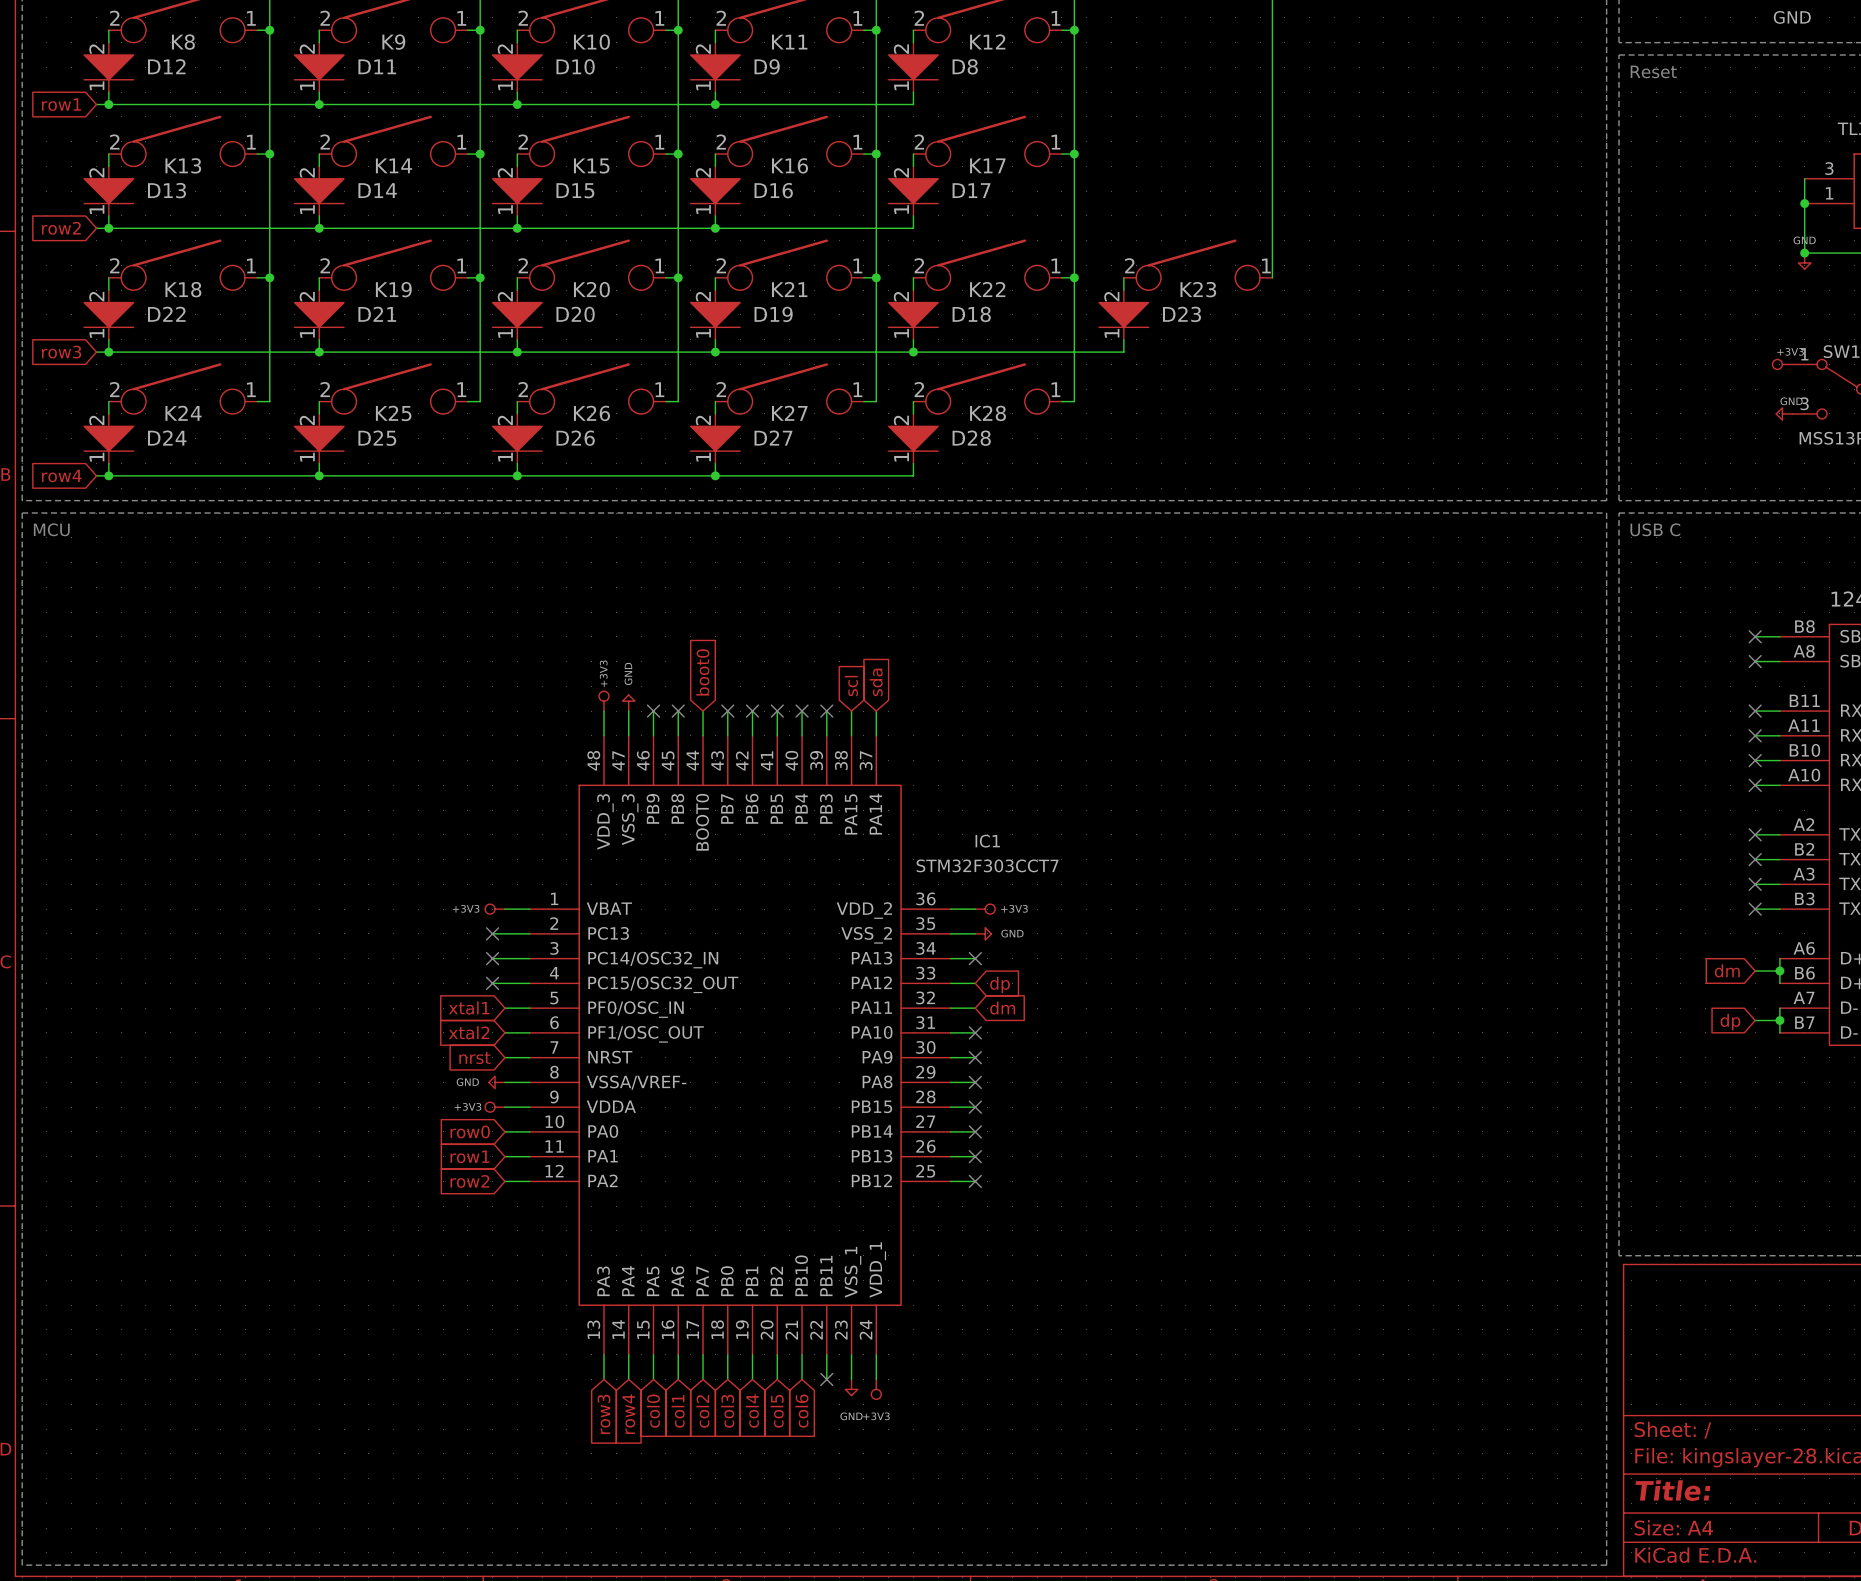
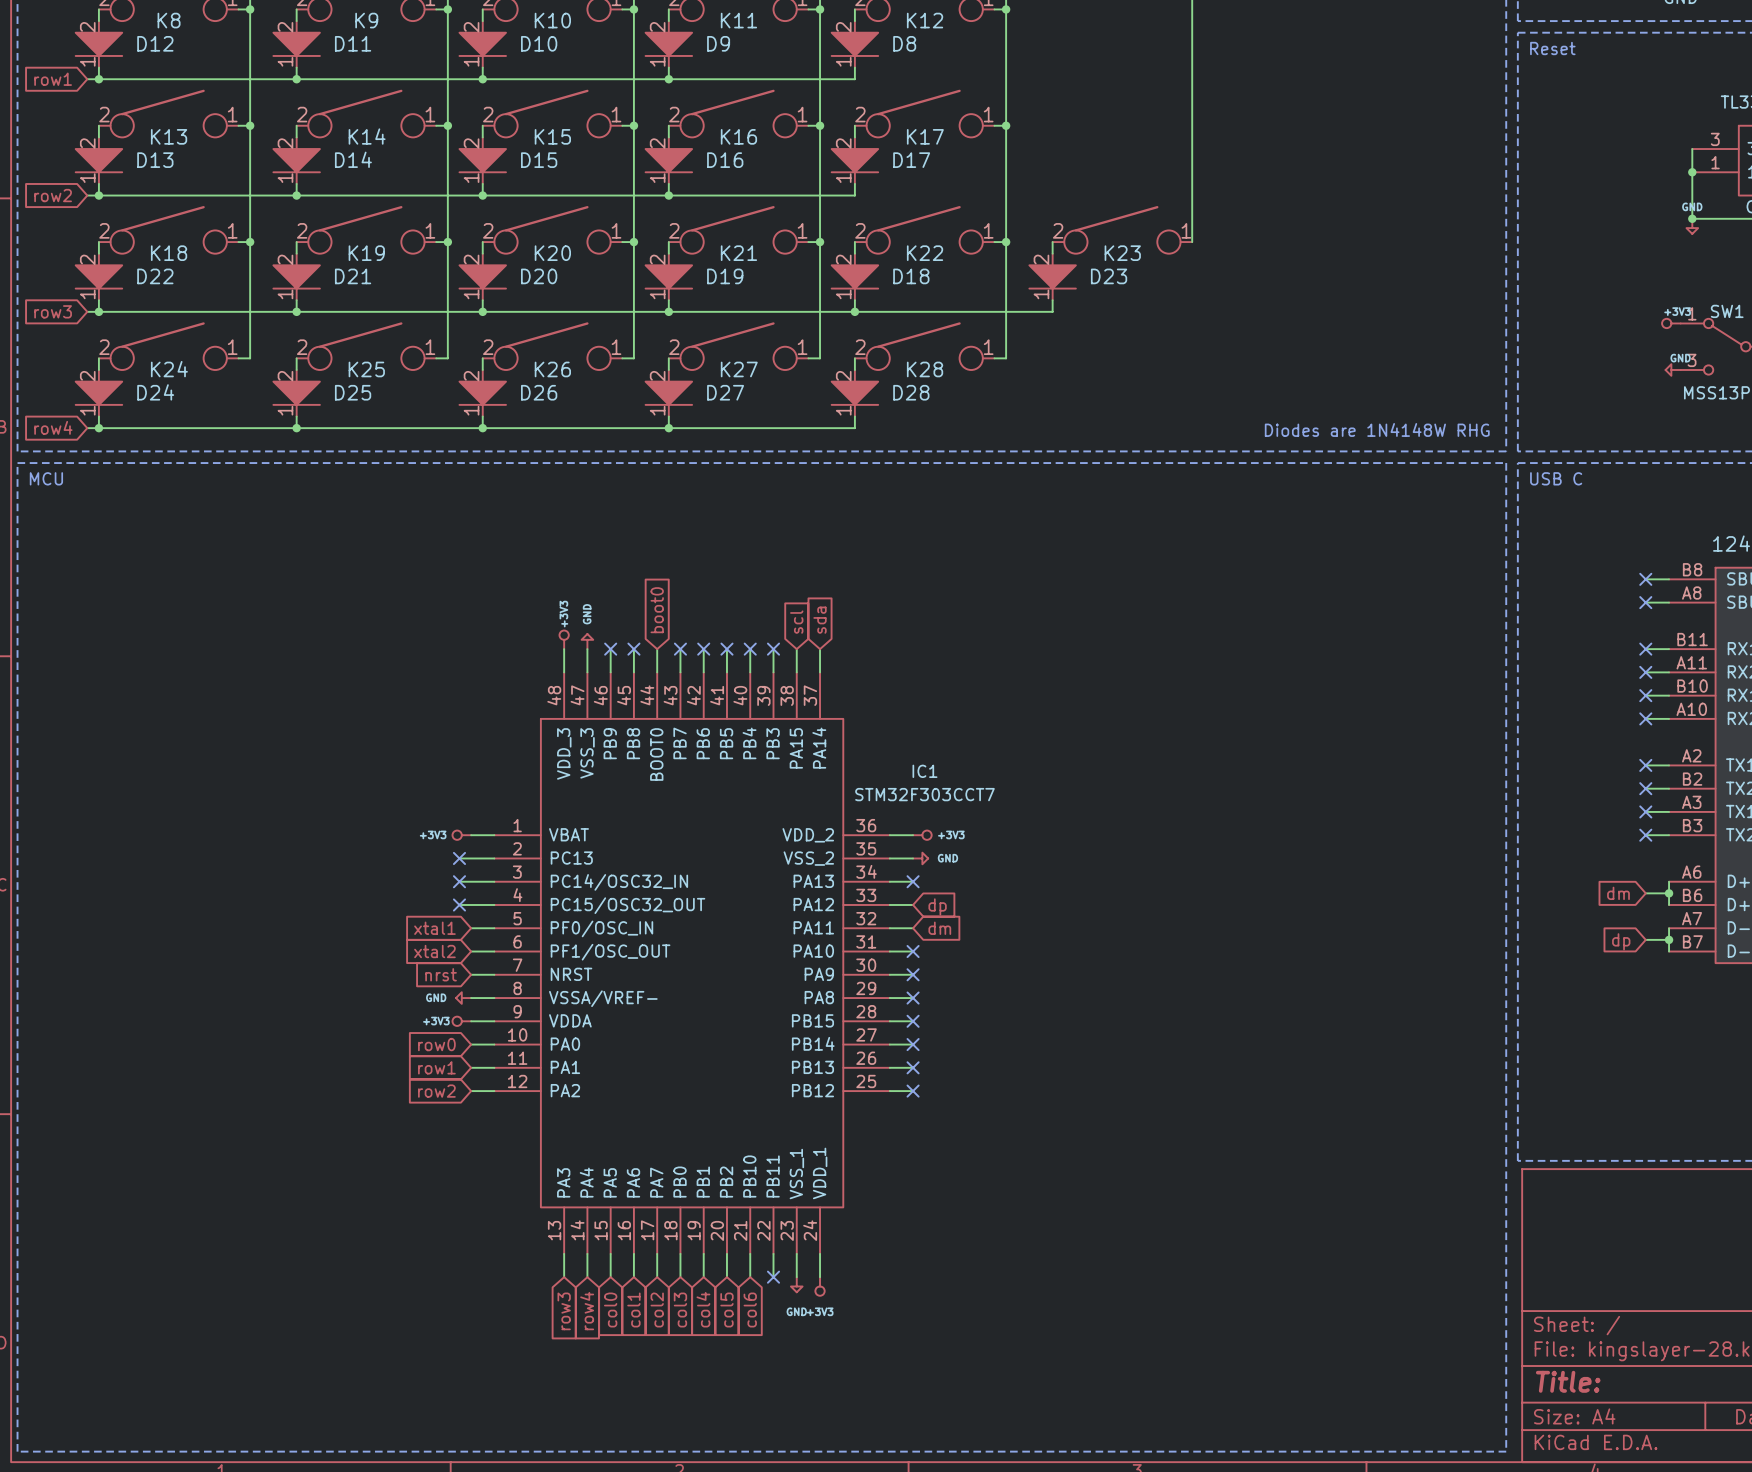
text: none -> Diodes are 1N4148W RHG (1377, 429)

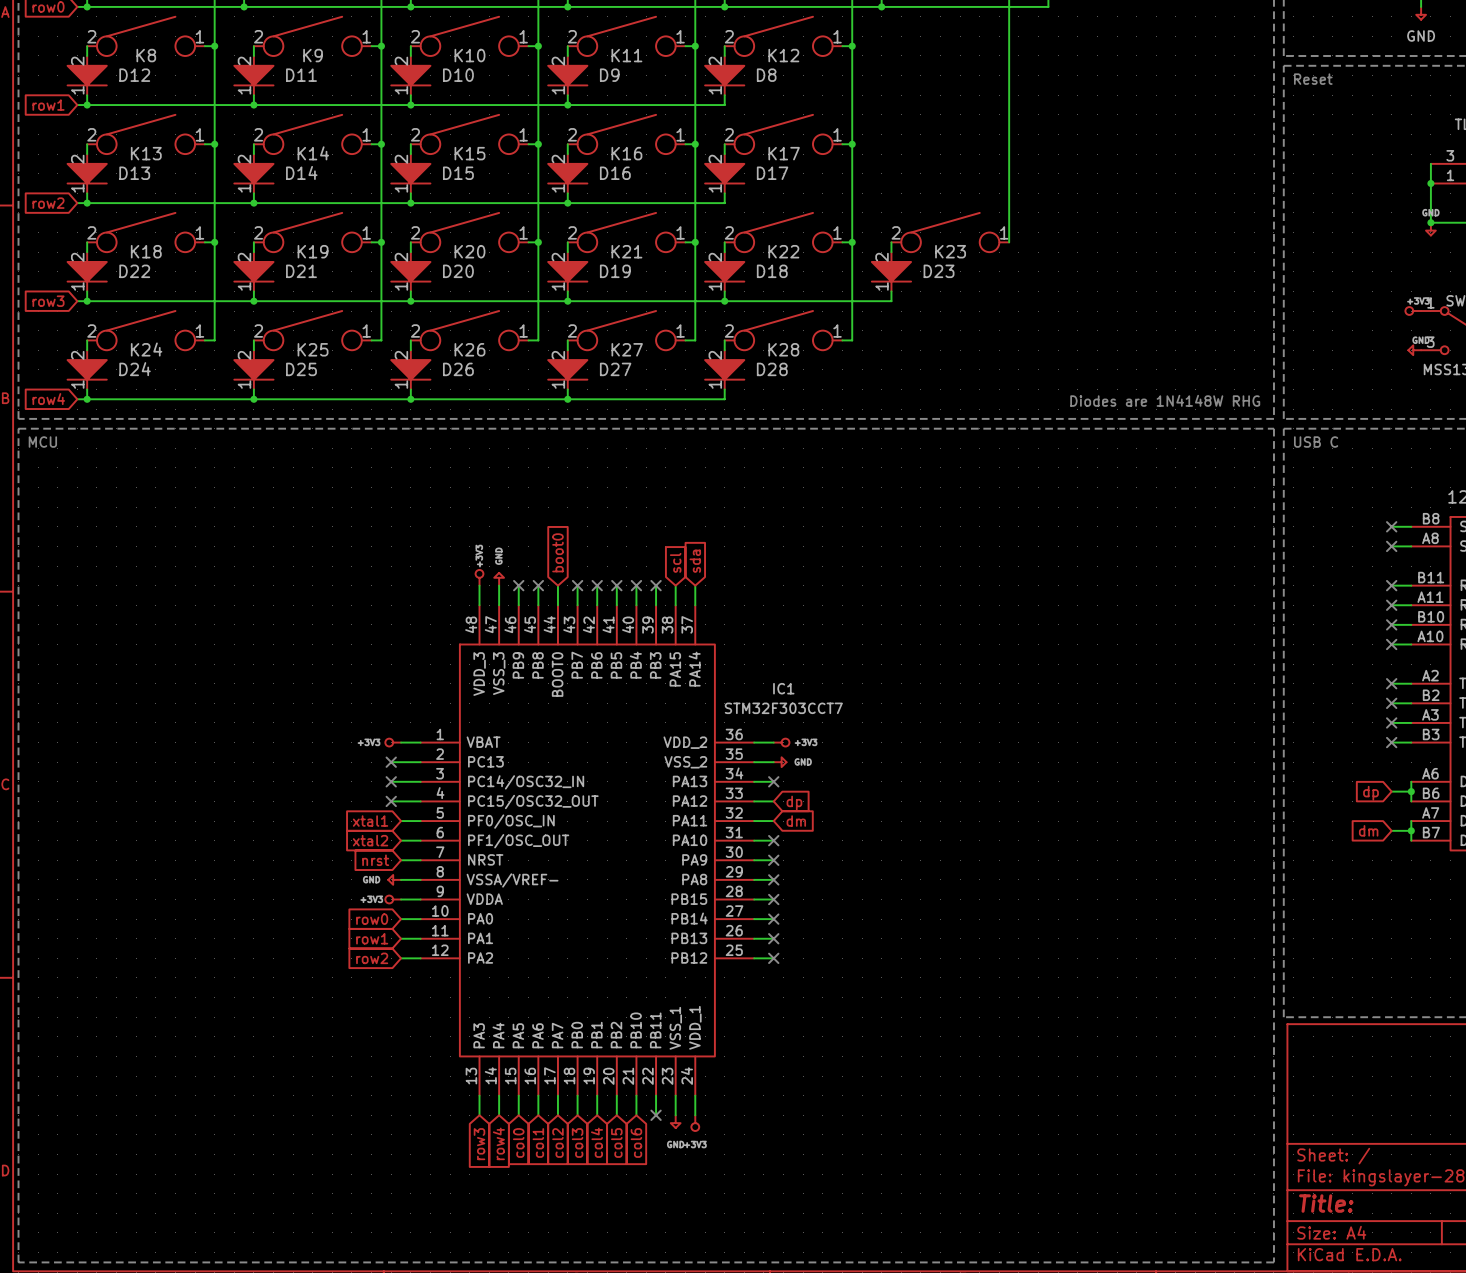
global label: dm (1618, 893) -> dp (1371, 793)
global label: dp (1621, 941) -> dm (1368, 830)

